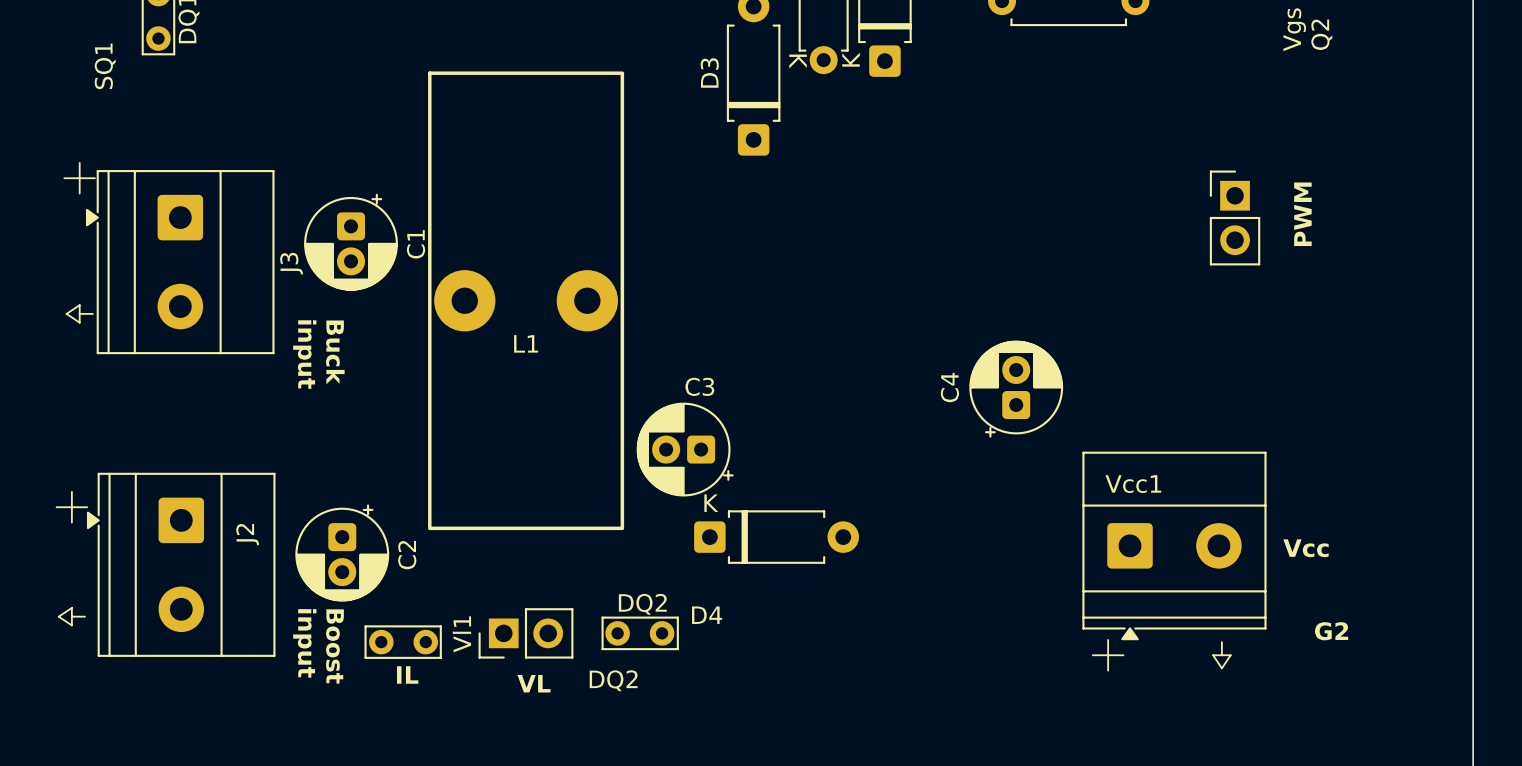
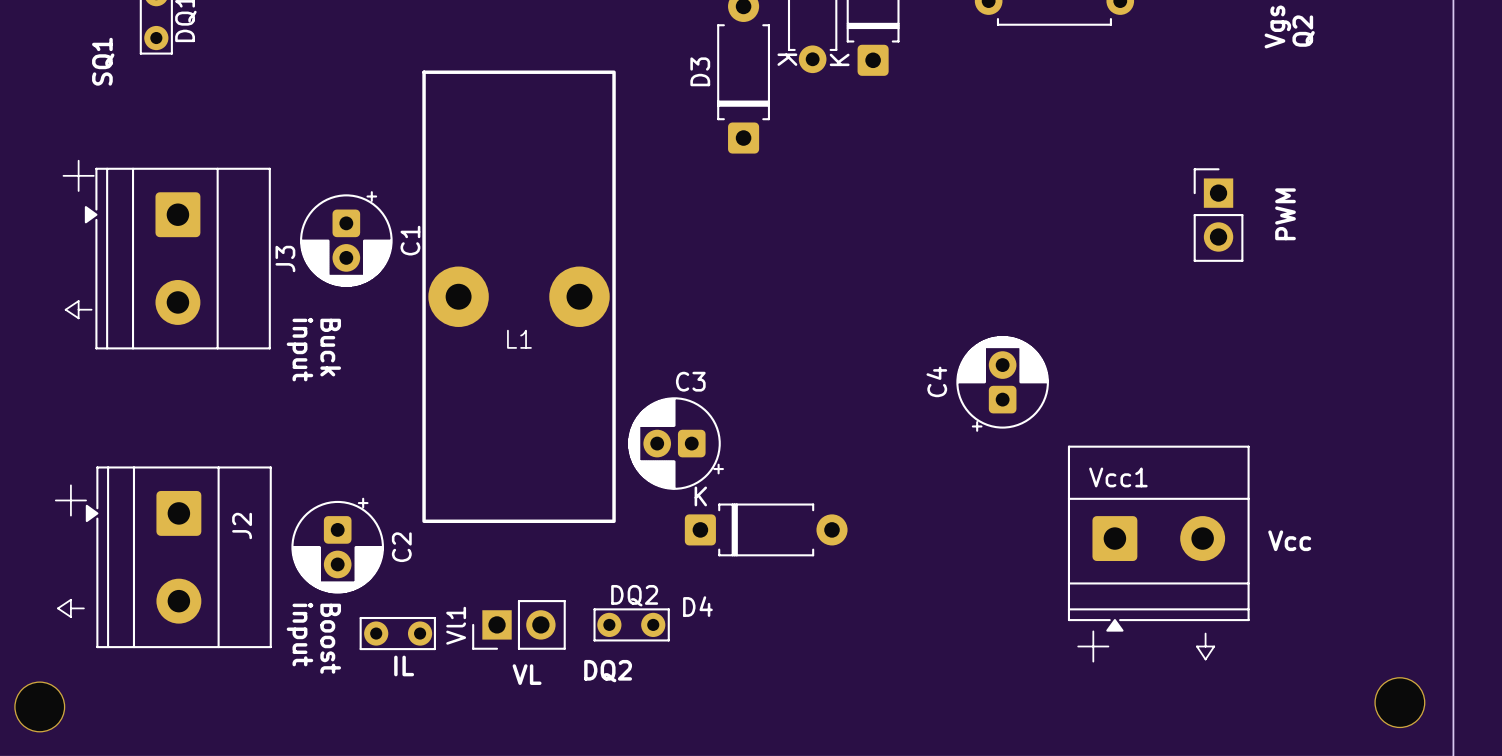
text: G2 (1331, 631) -> none
via: none -> (1399, 702)
via: none -> (39, 706)

